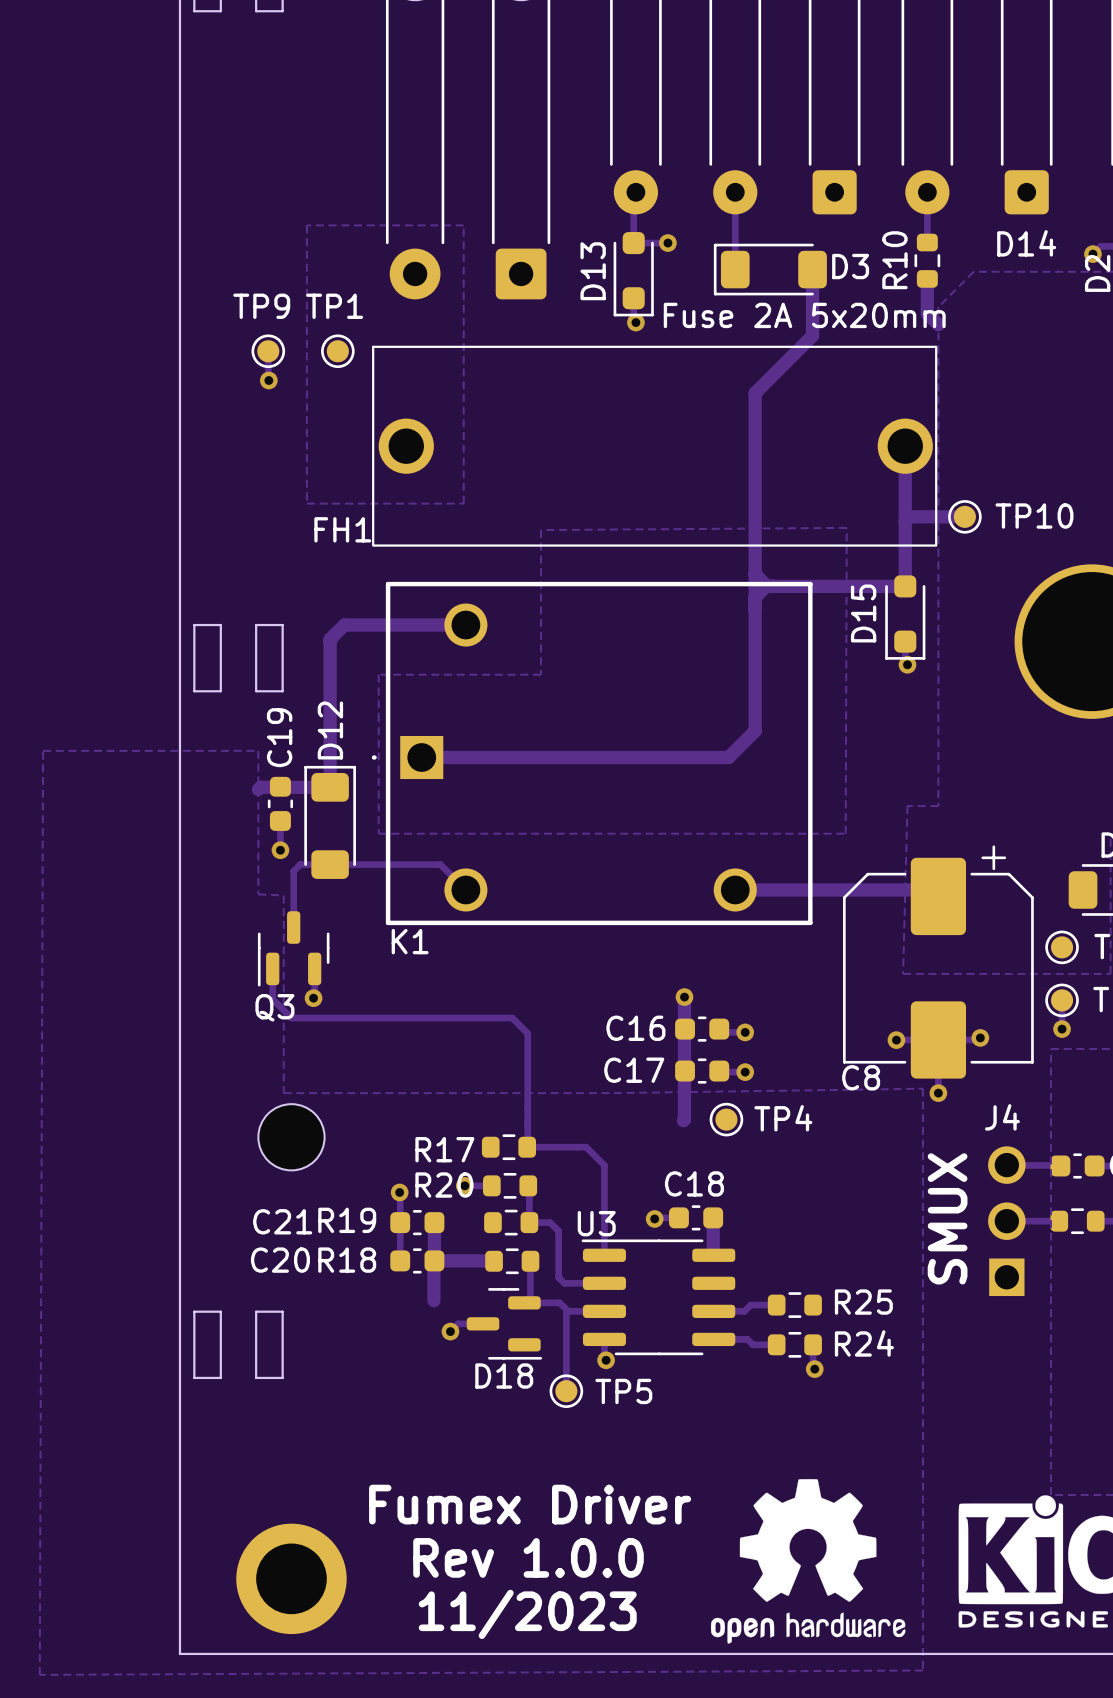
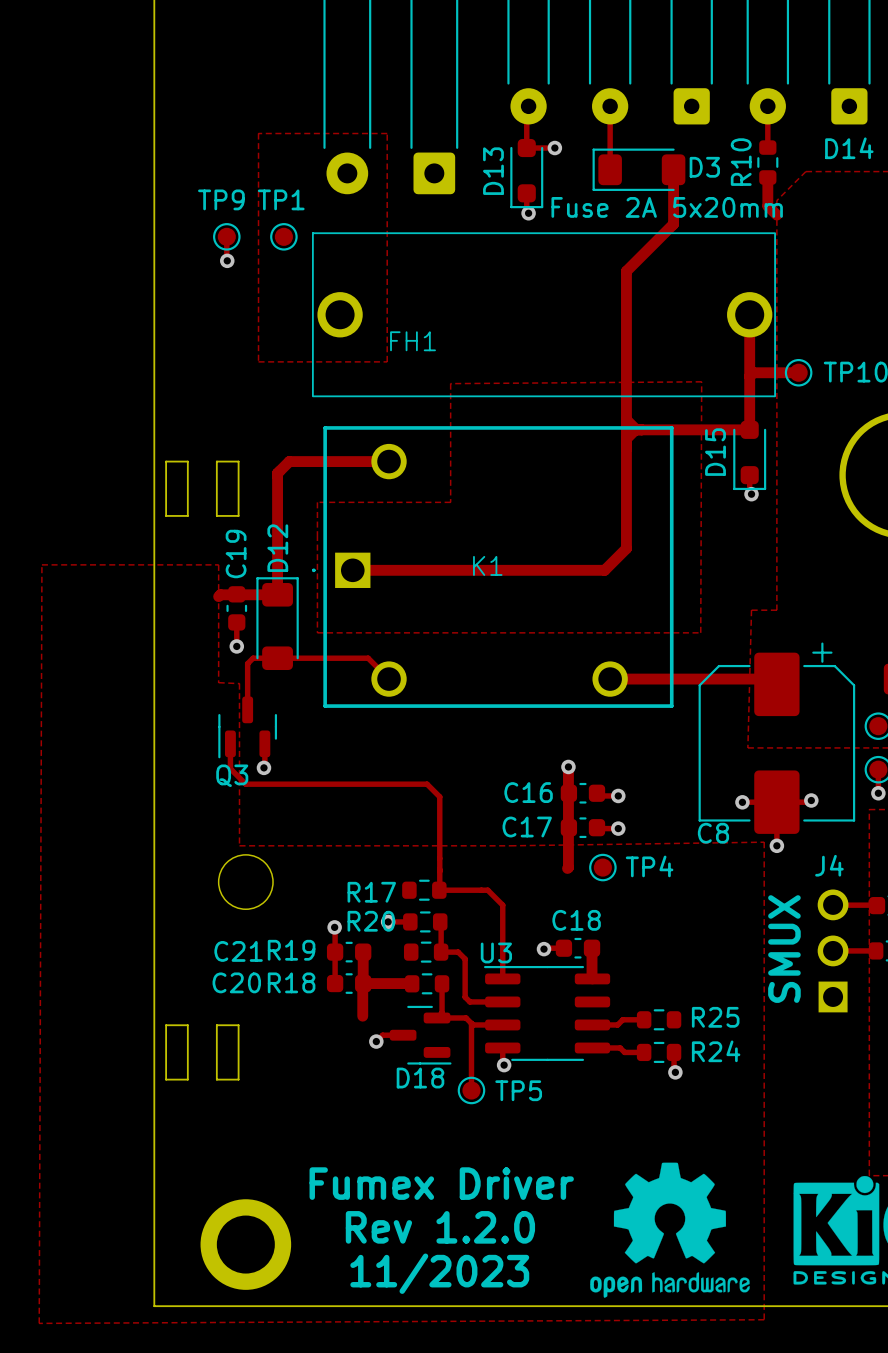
FH1 name position: FH1 (342, 529) -> FH1 (413, 341)
K1 name position: K1 (410, 941) -> K1 (487, 565)
text: Rev 1.0.0 (528, 1557) -> Rev 1.2.0 (440, 1227)

